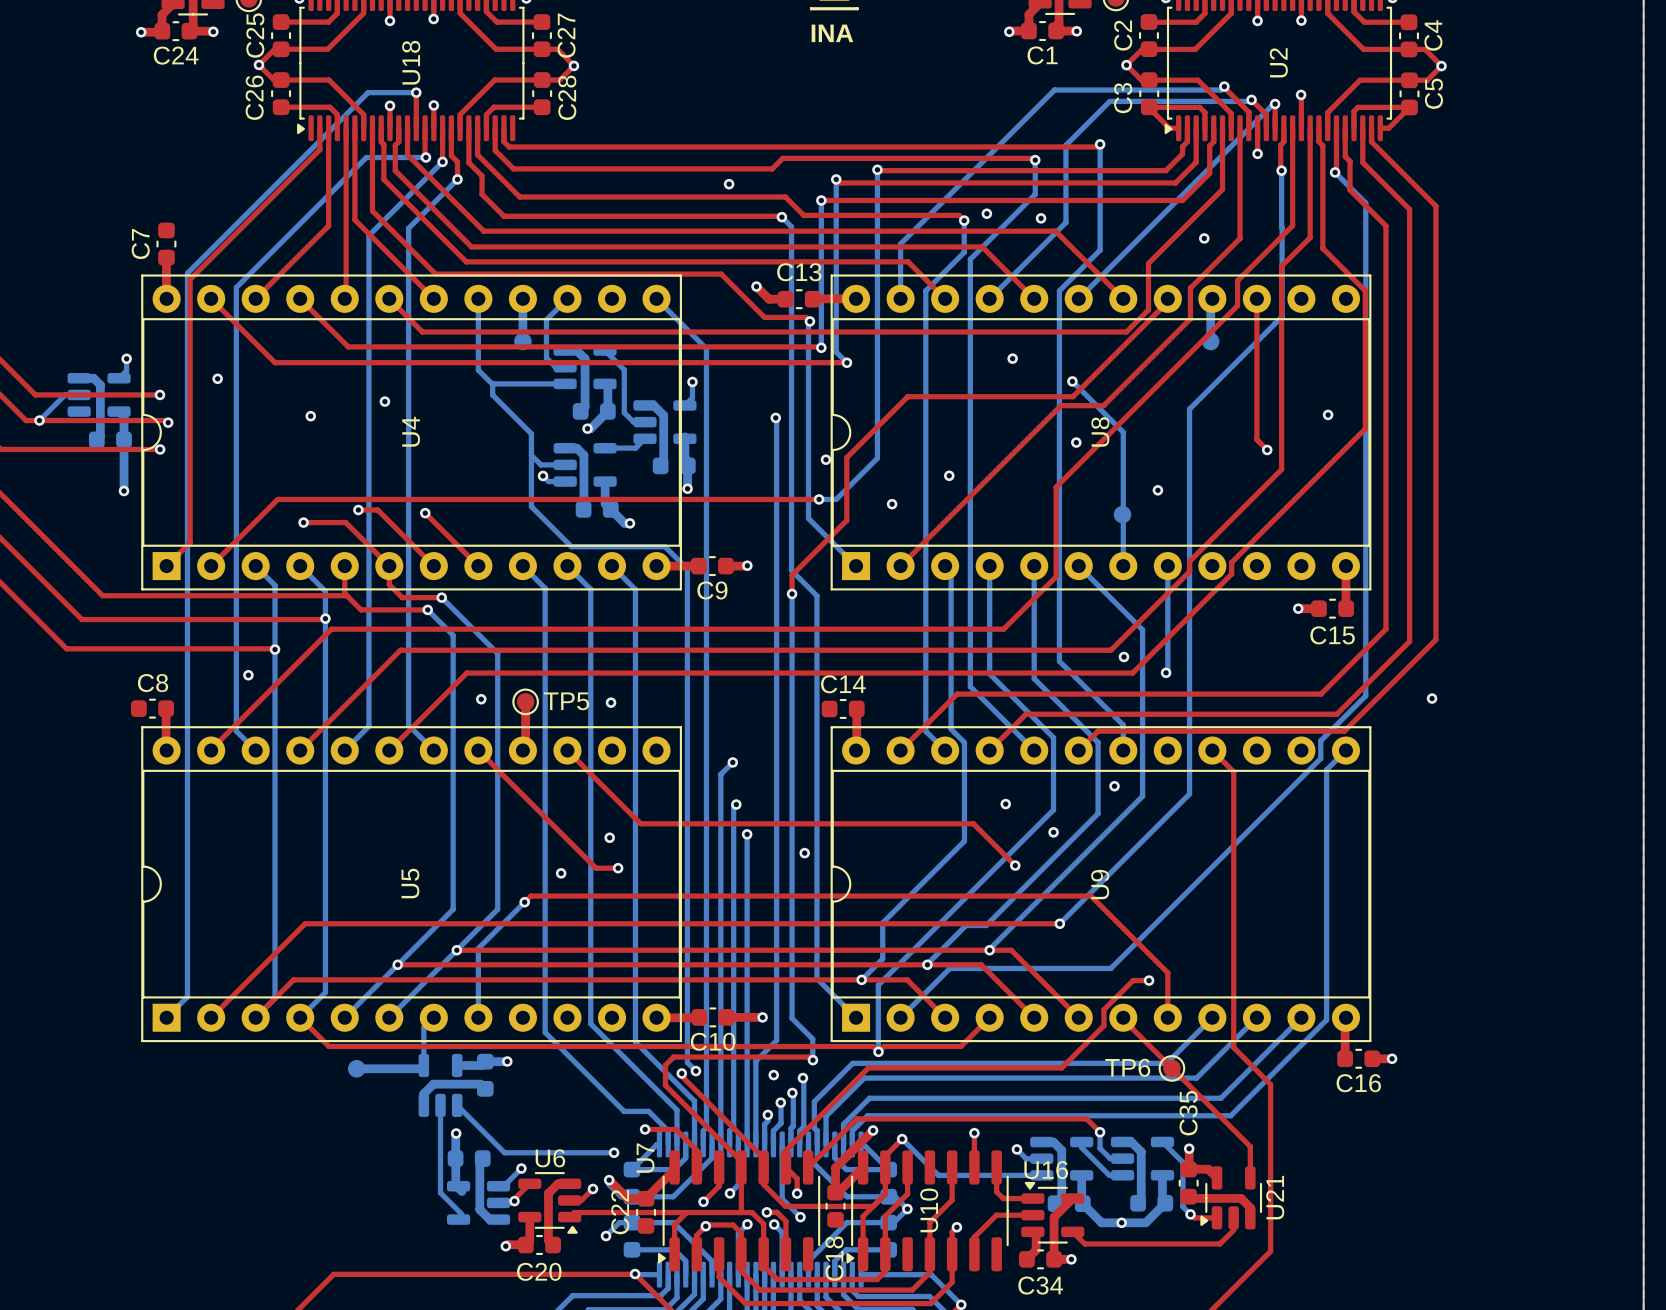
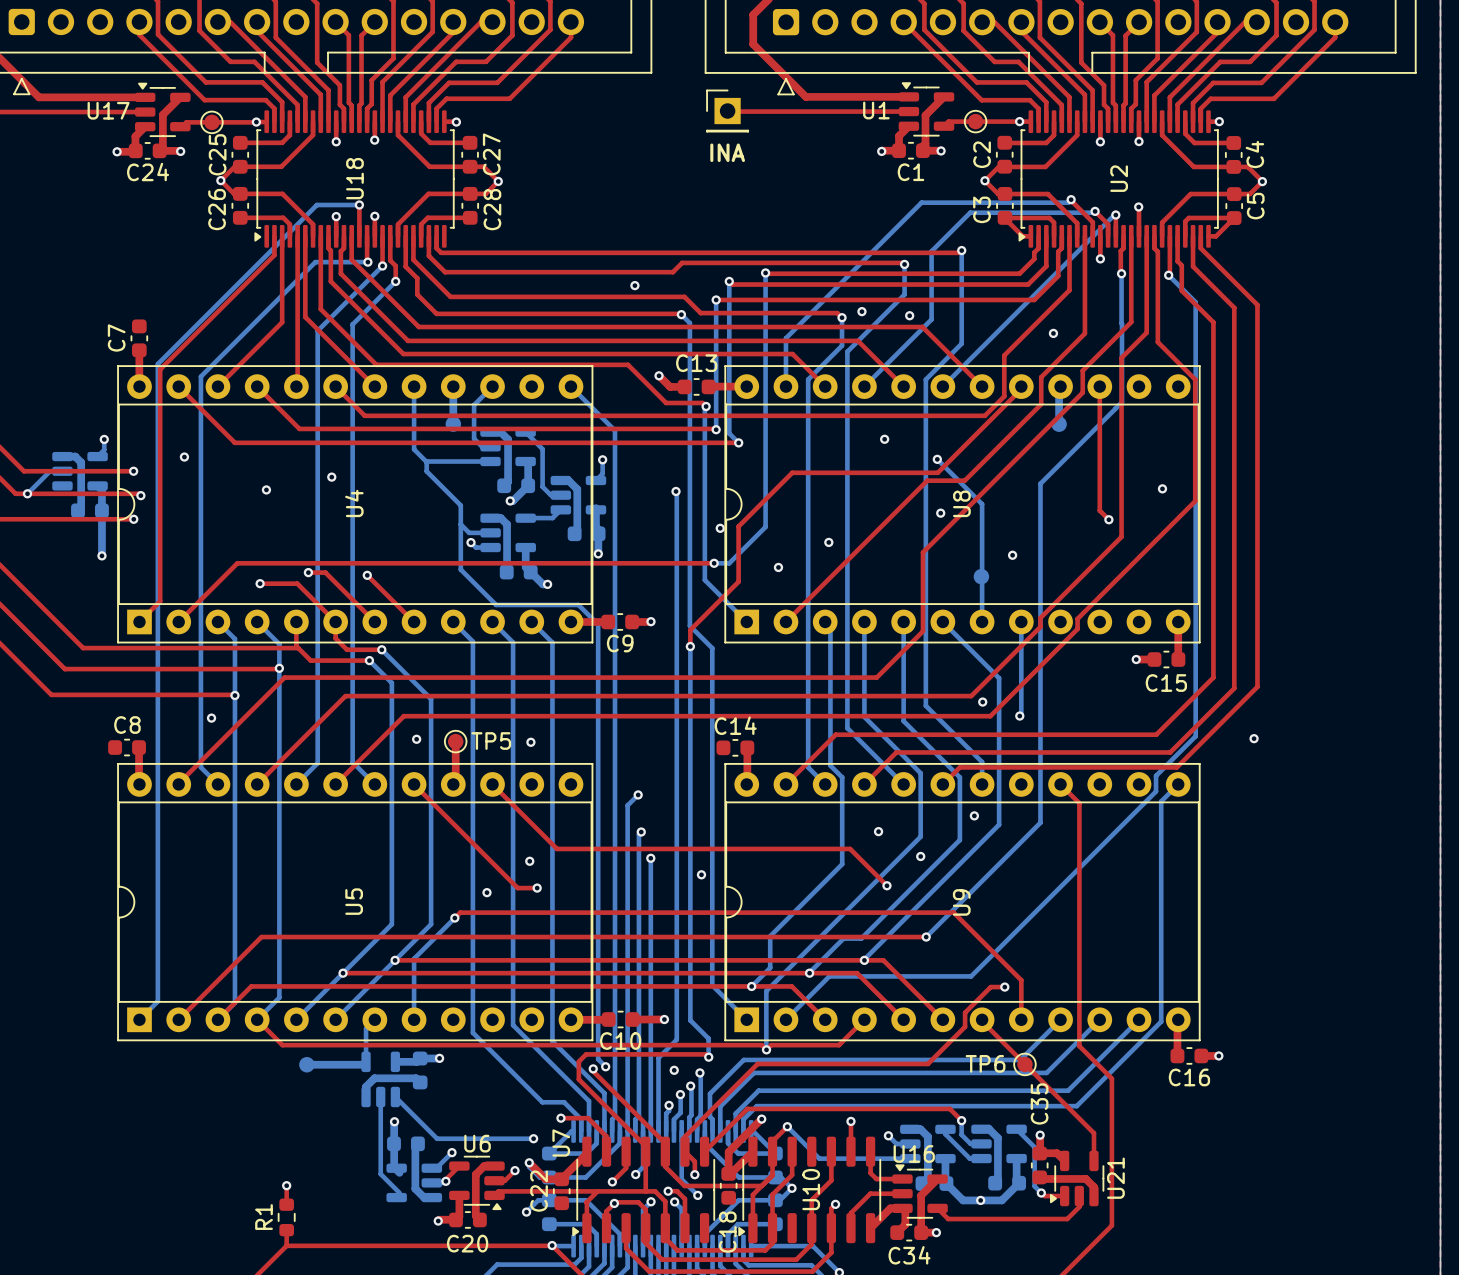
top track: none -> (286, 1185) (286, 1204)
via: none -> (286, 1185)
top track: none -> (902, 1208) (890, 1208) (870, 1228)
R1: none -> (286, 1217)
top track: none -> (286, 1230) (286, 1245)

